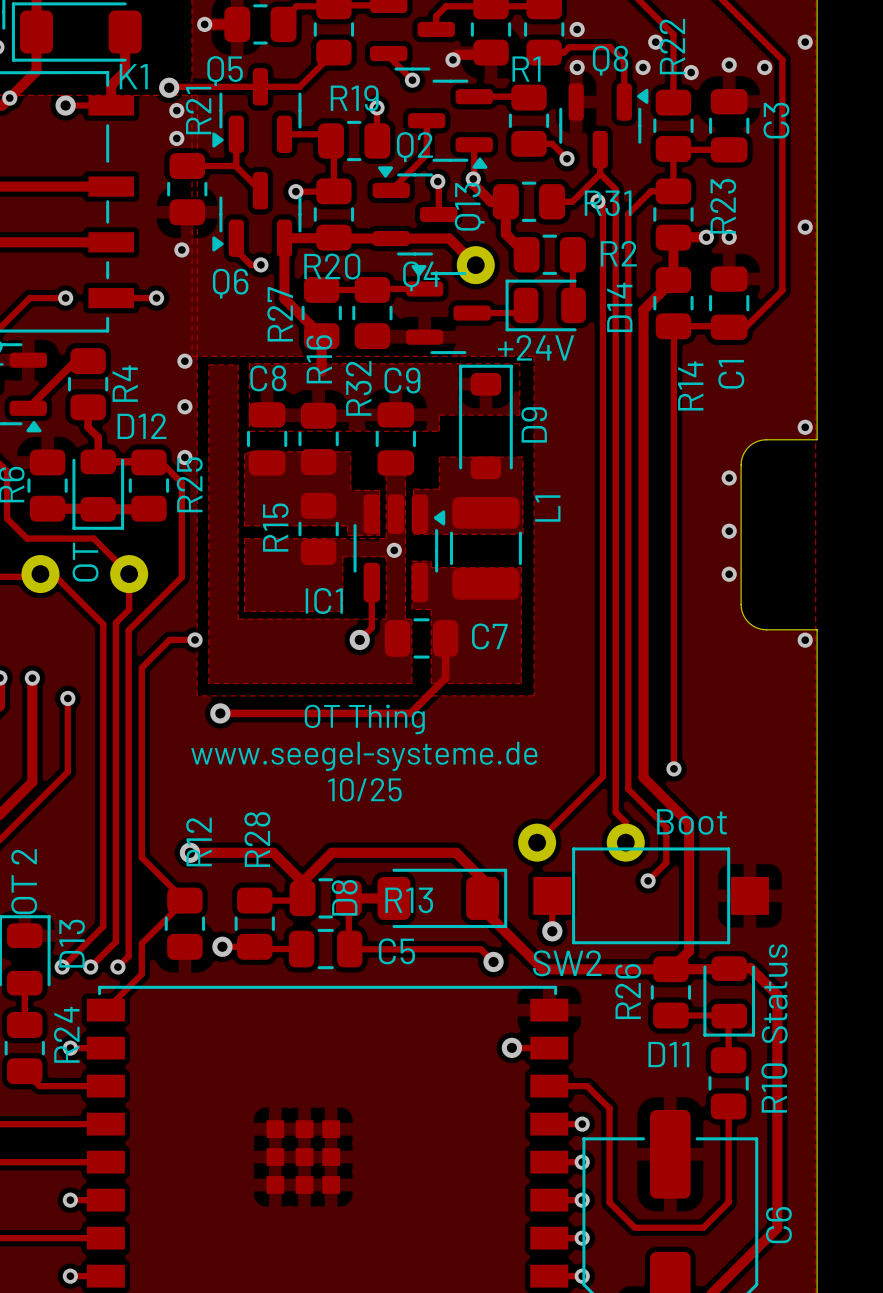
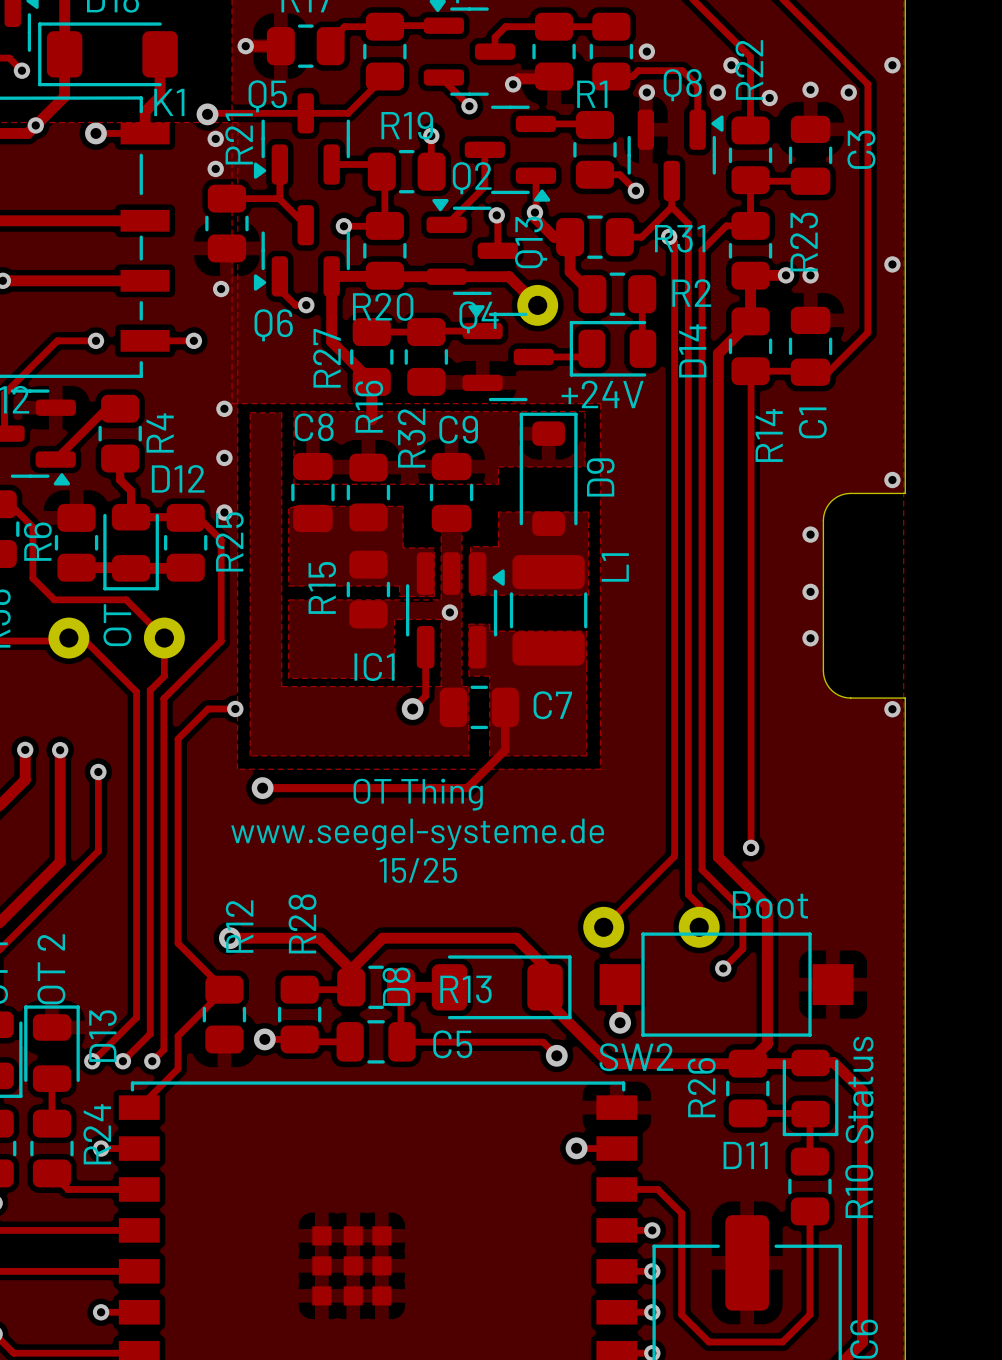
text: 10/25 (364, 789) -> 15/25 (418, 870)

